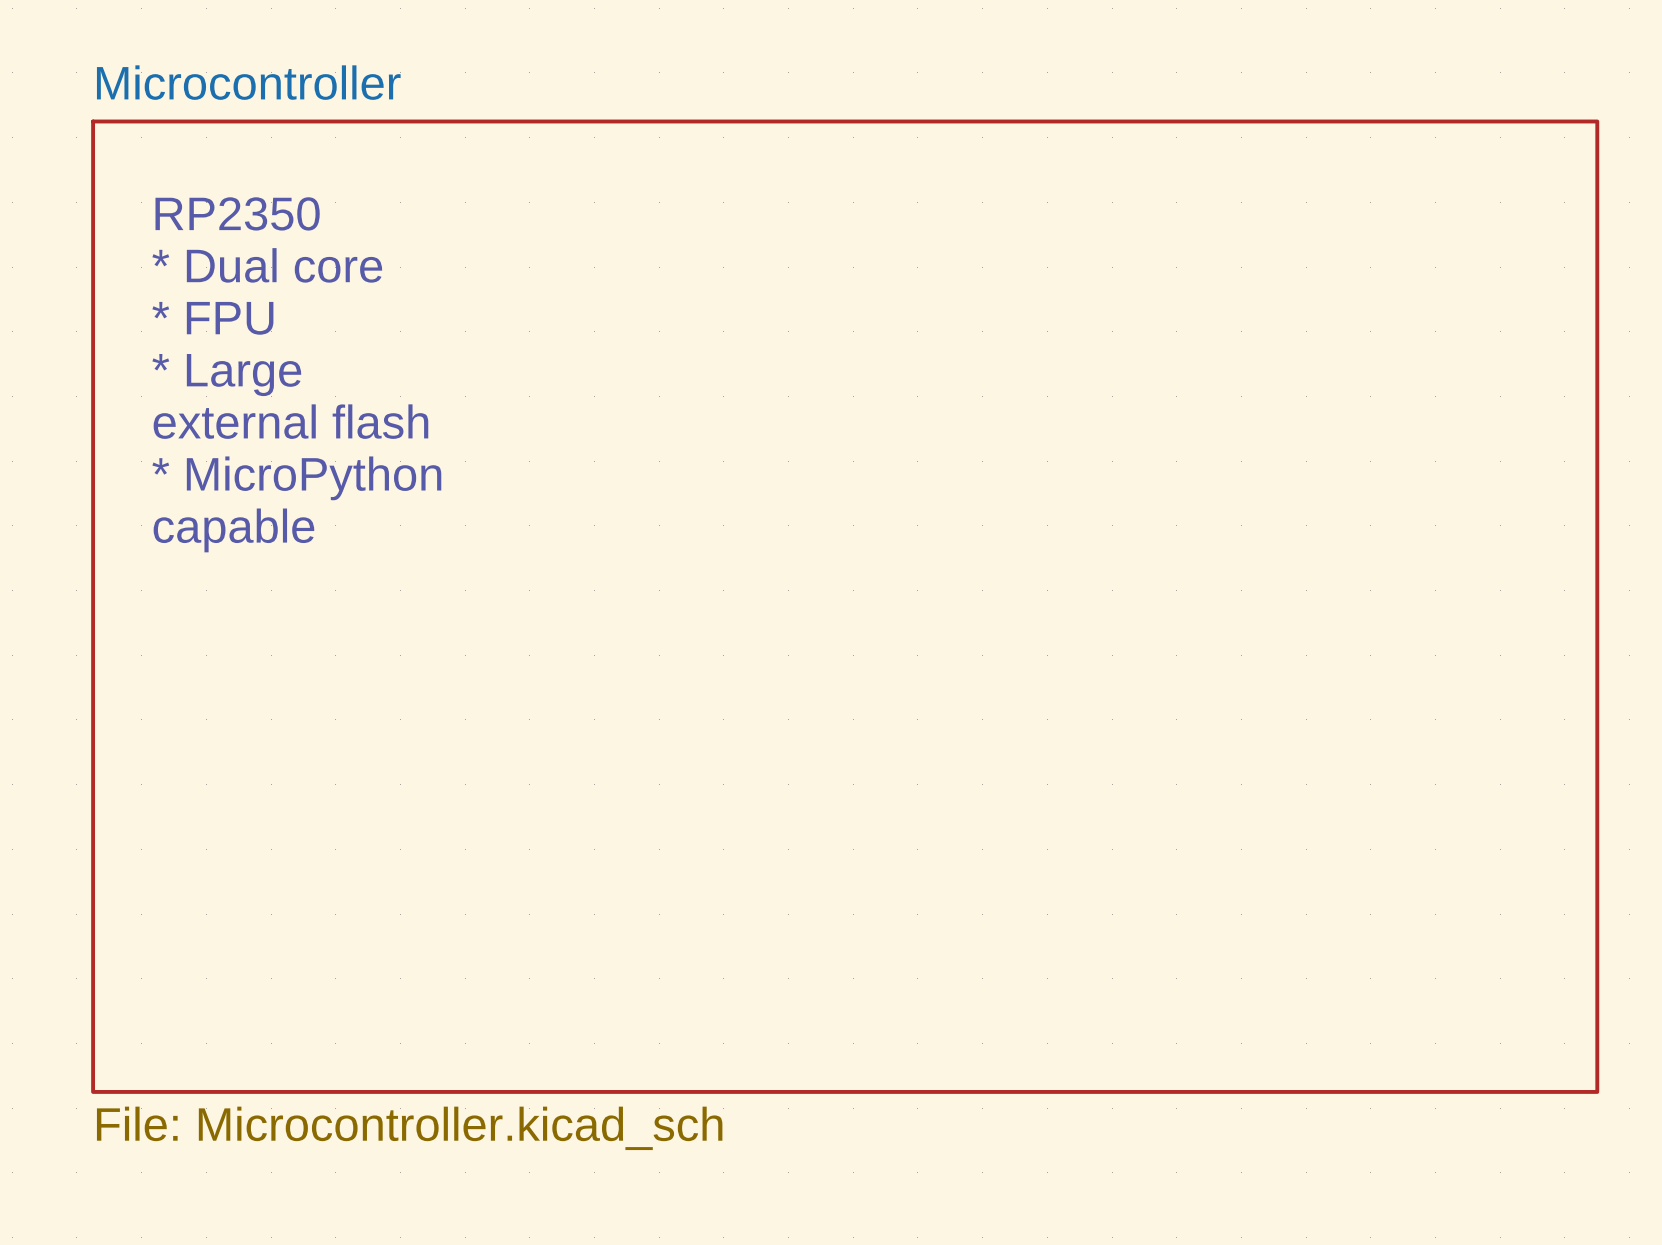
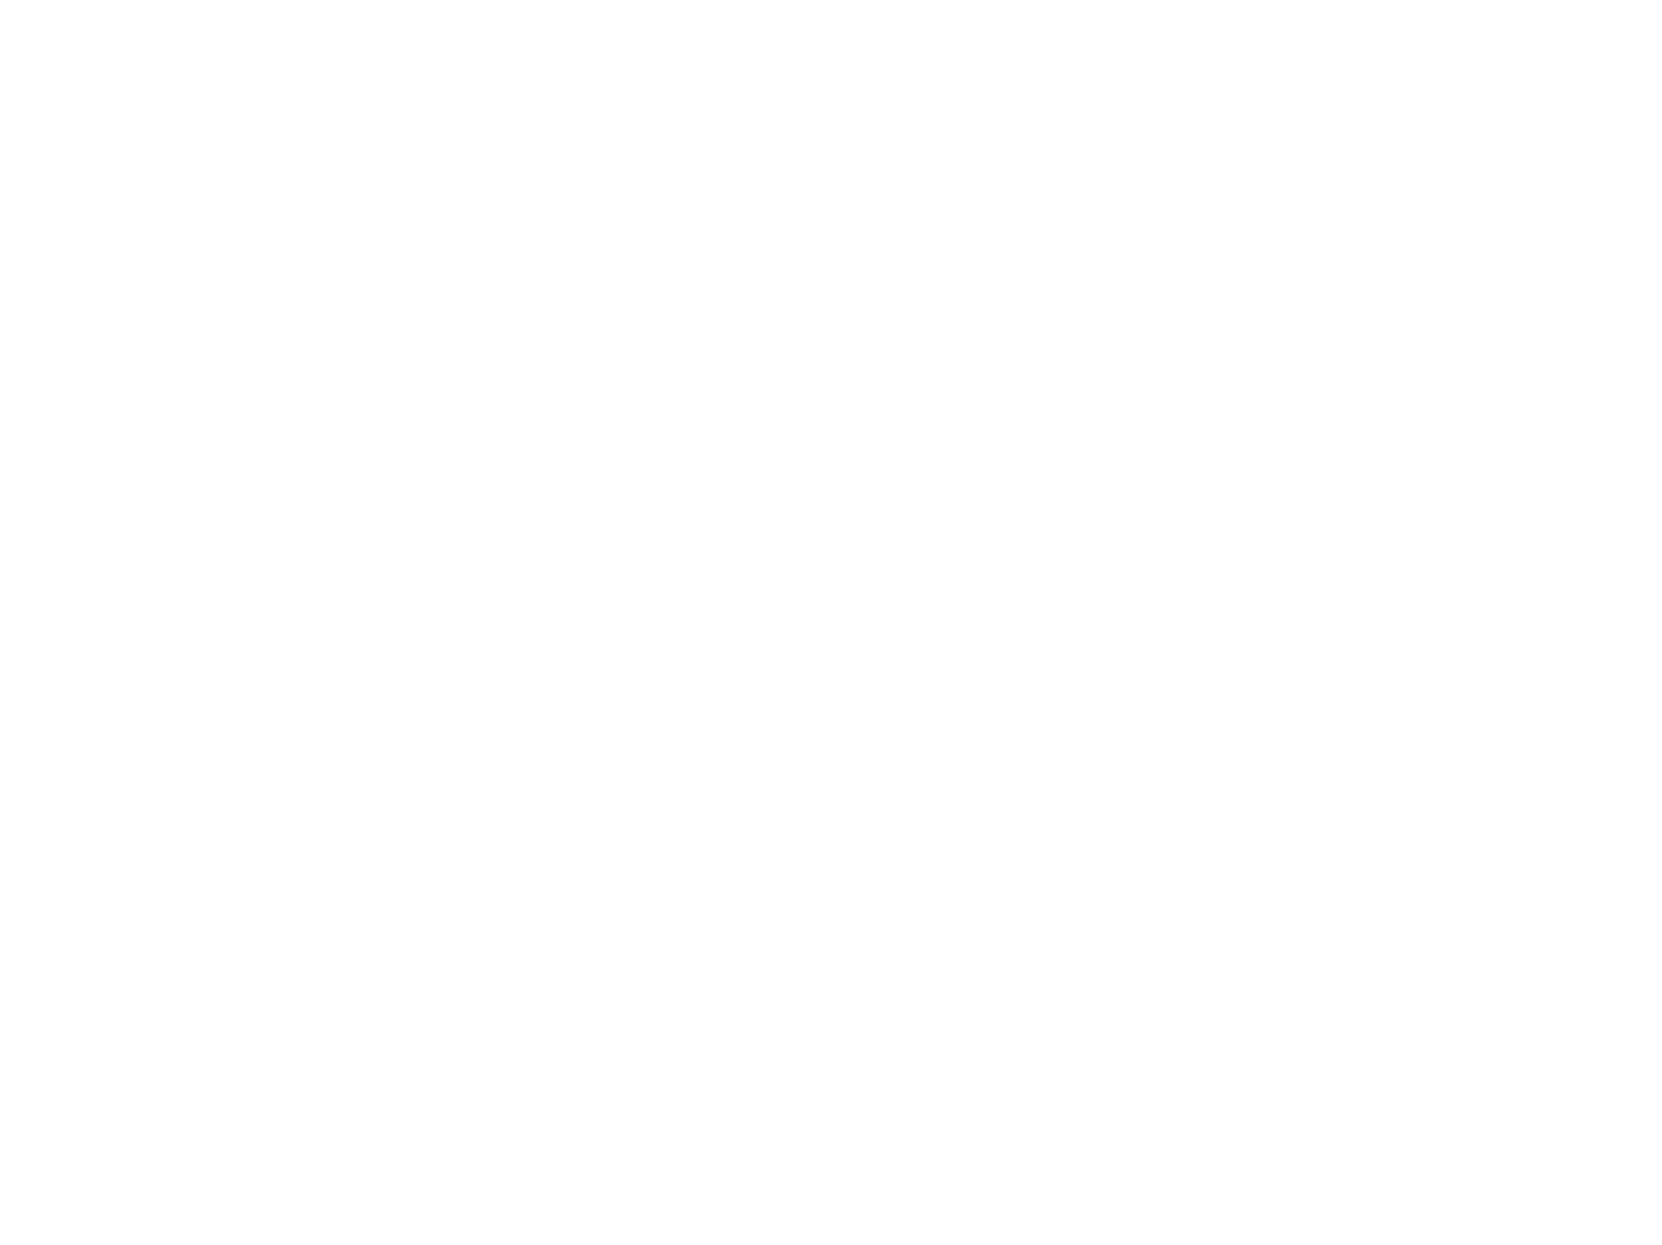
text: RP2350 (237, 213) -> none
text: * Dual core (267, 265) -> none
text: * FPU (212, 318) -> none
text: * Large (226, 375) -> none
text: external flash (290, 421) -> none
text: * MicroPython (296, 478) -> none
text: capable (233, 530) -> none
sheet Microcontroller: File: Microcontroller.kicad_sch (845, 606) -> none

